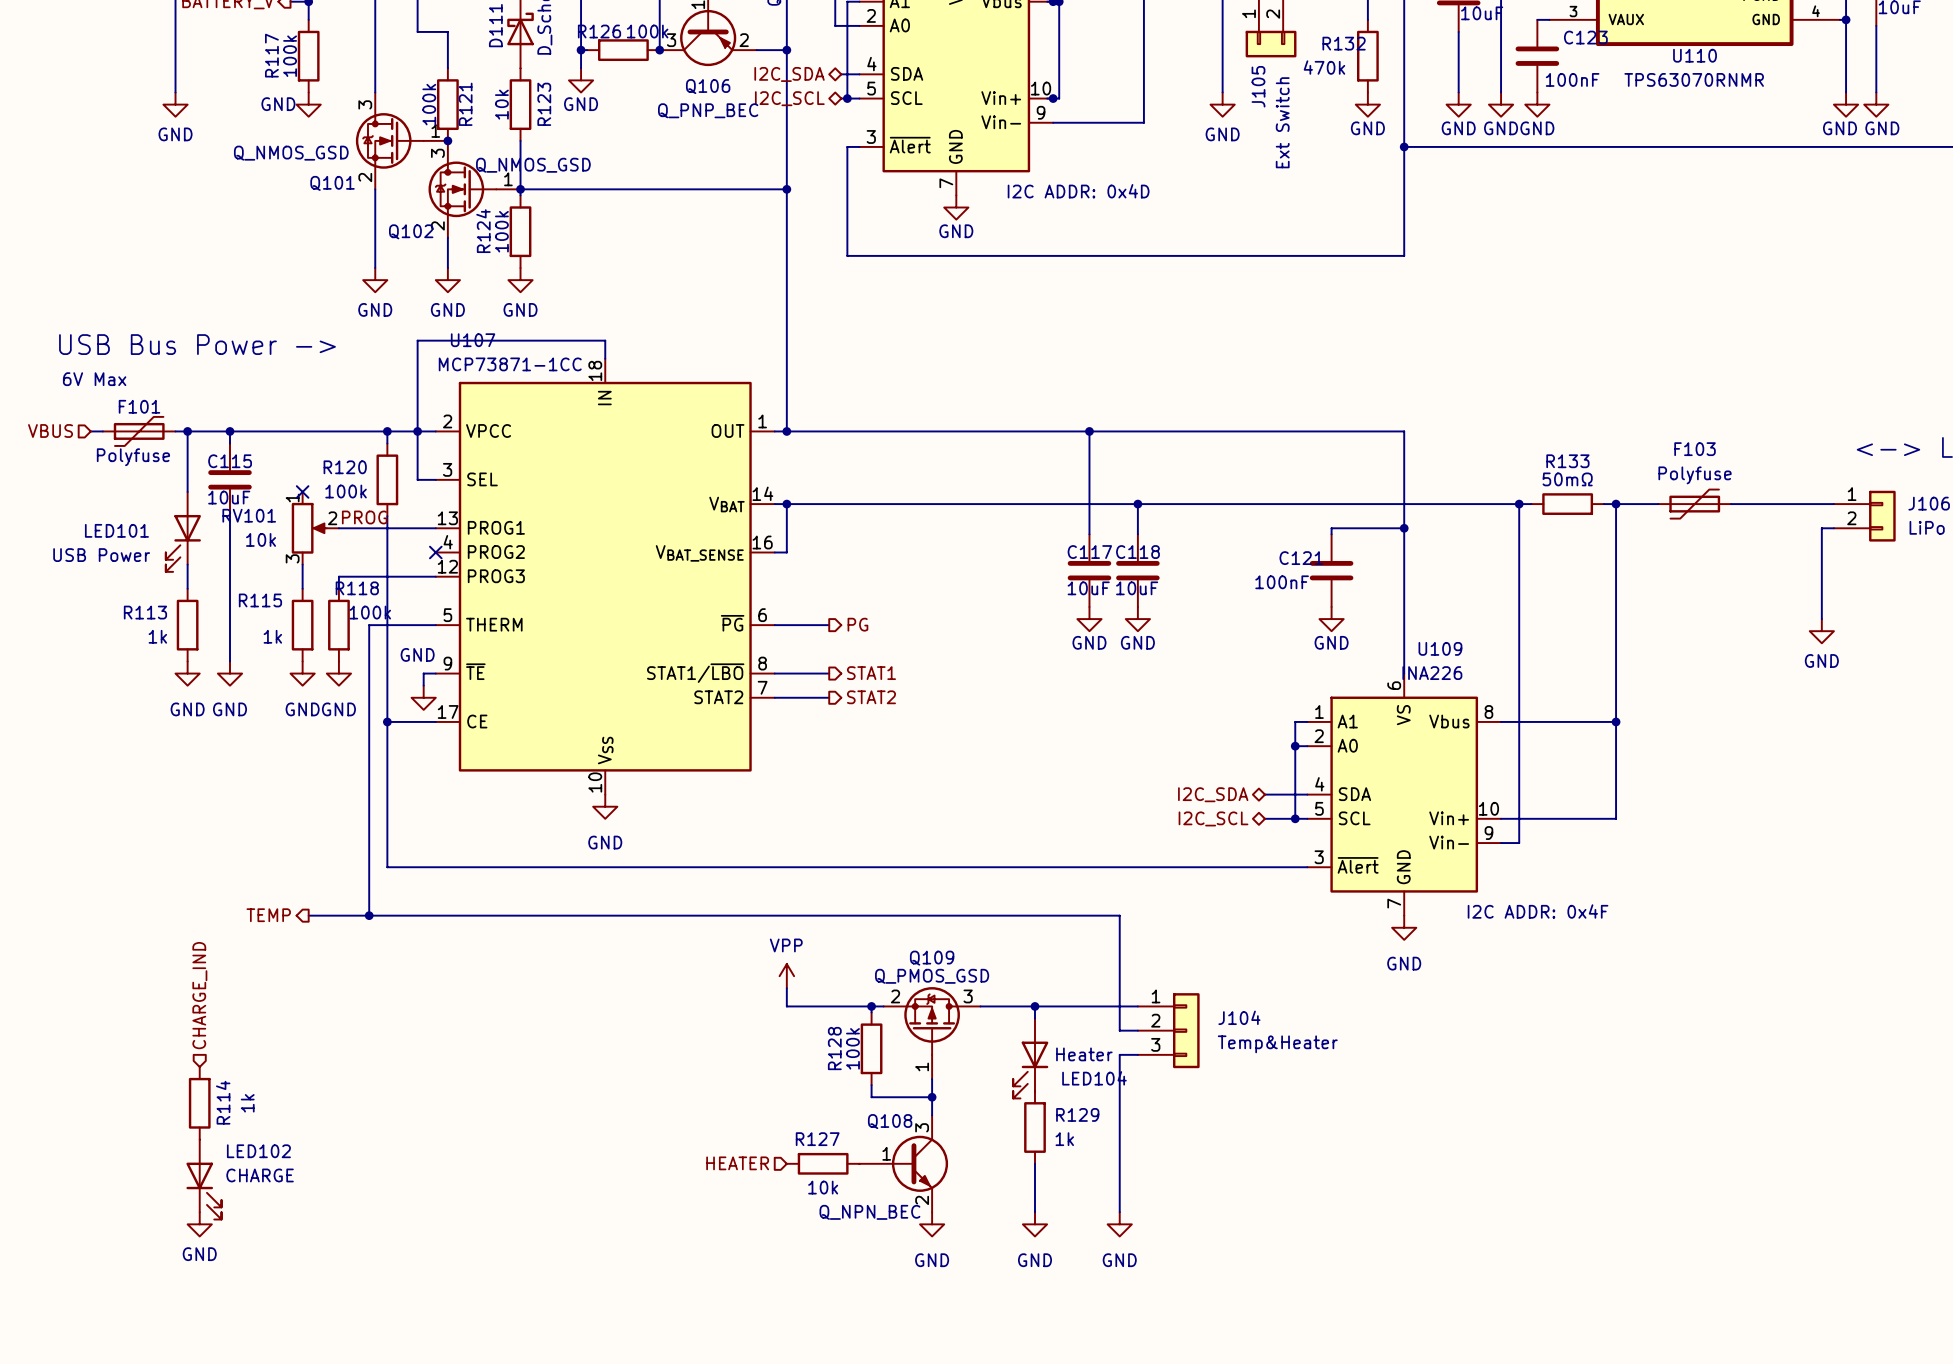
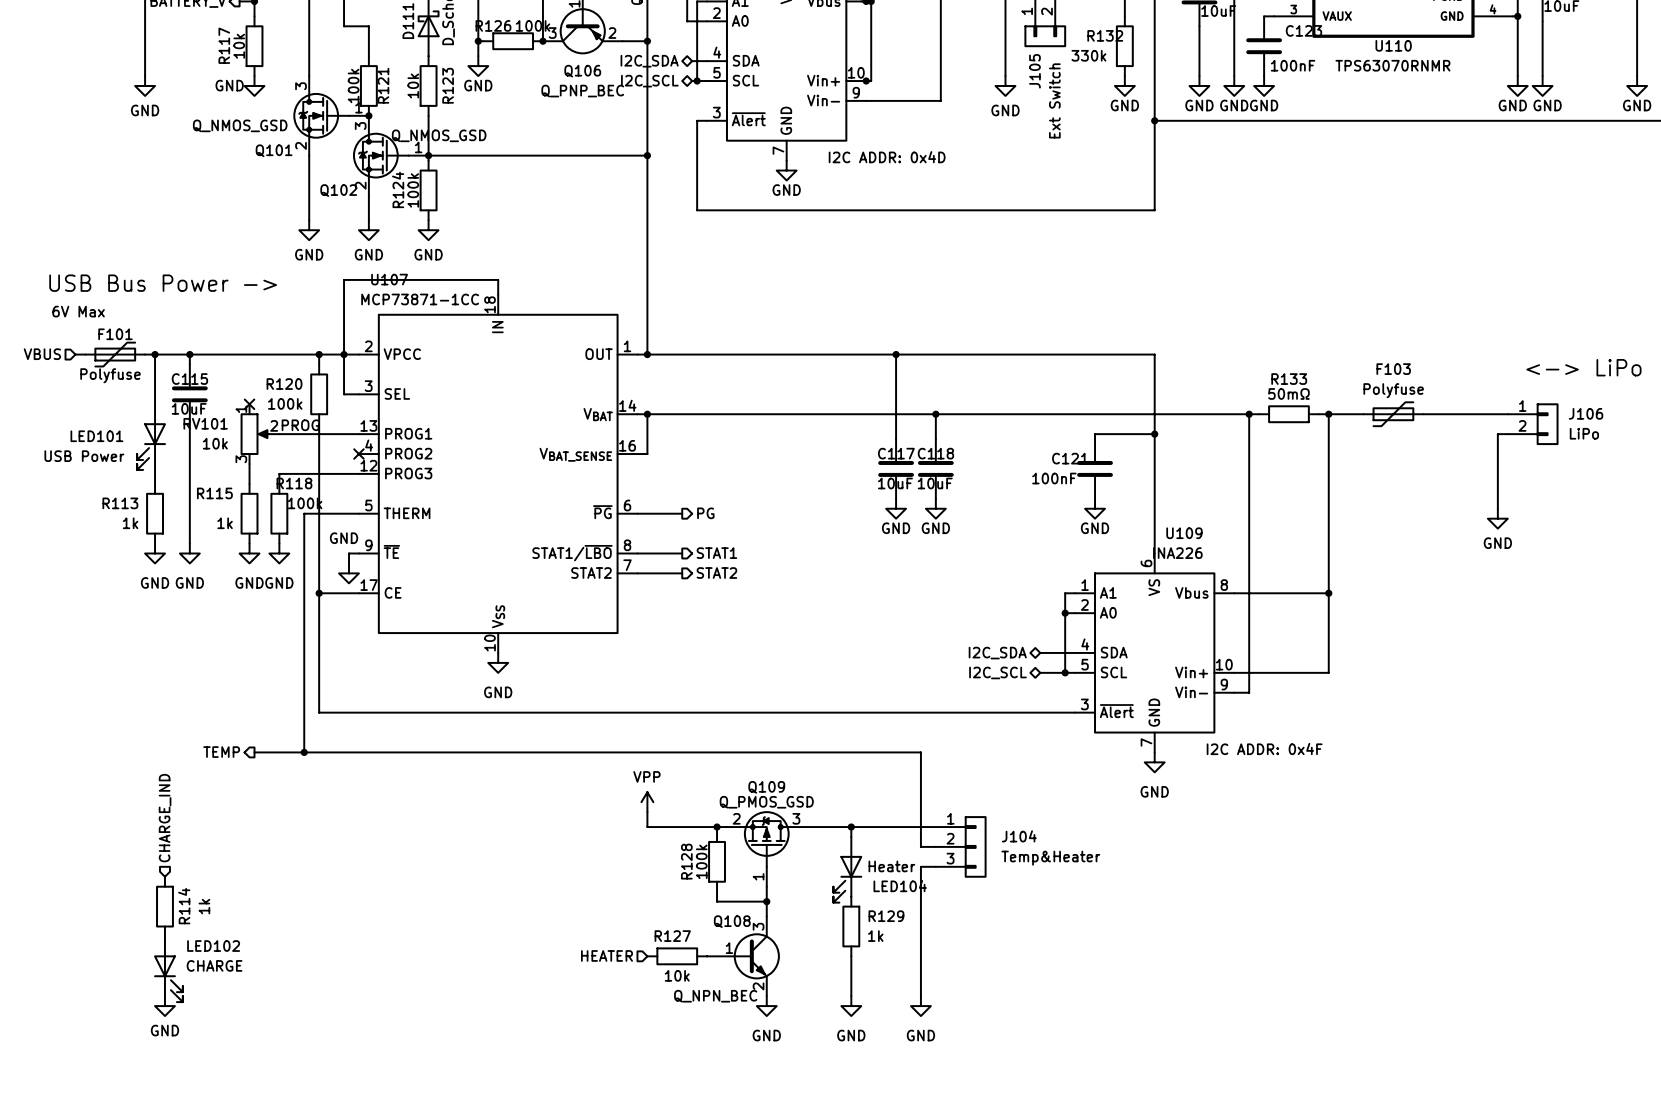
R117 value: 100k (290, 56) -> 10k (239, 46)
R132 value: 470k (1324, 67) -> 330k (1088, 55)

